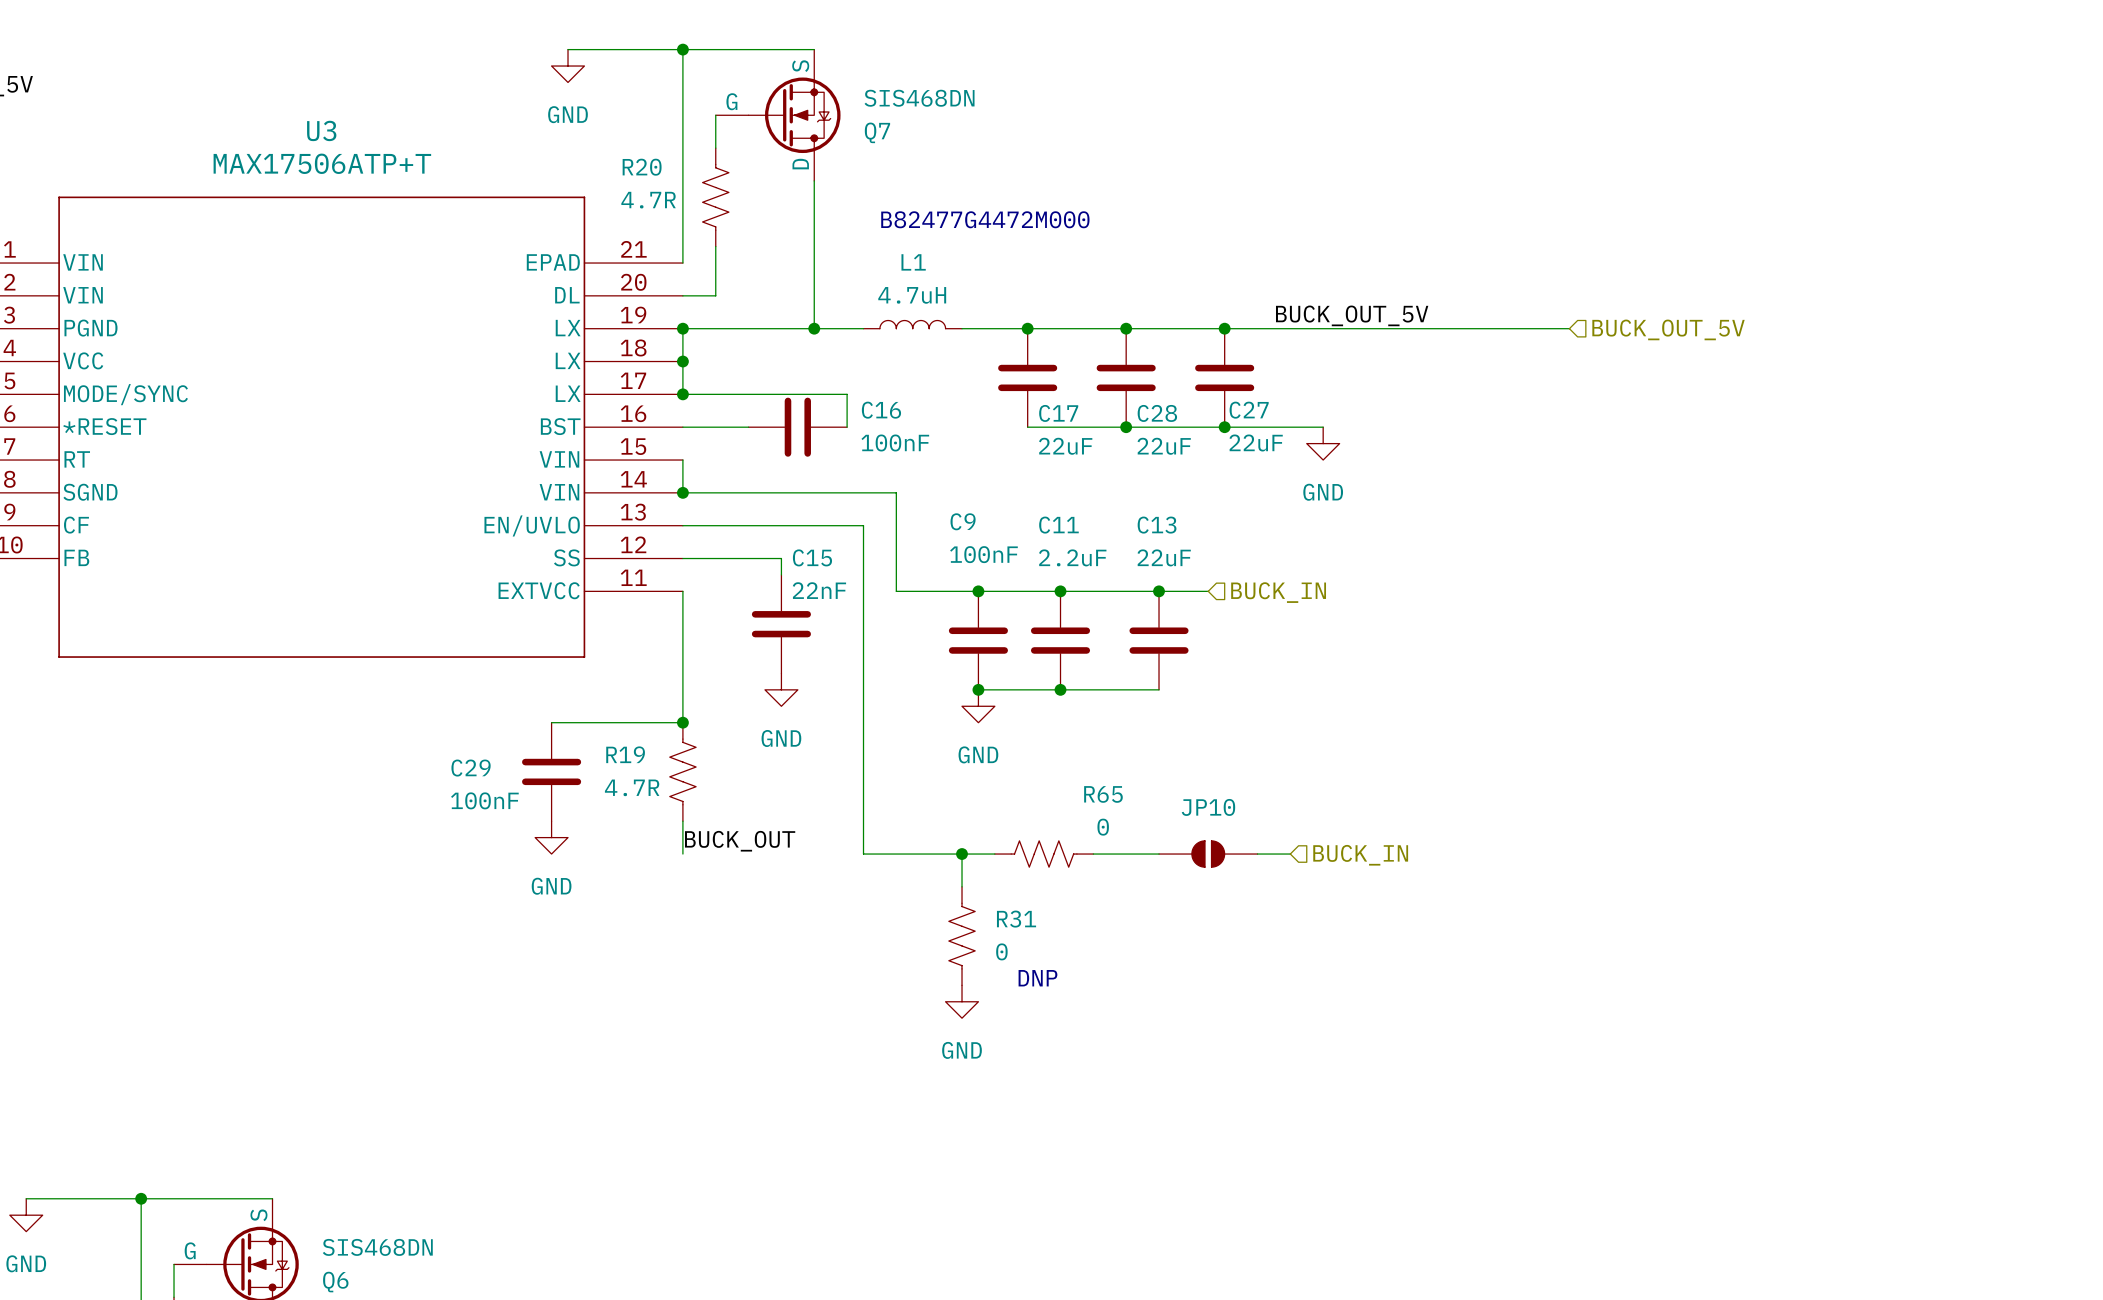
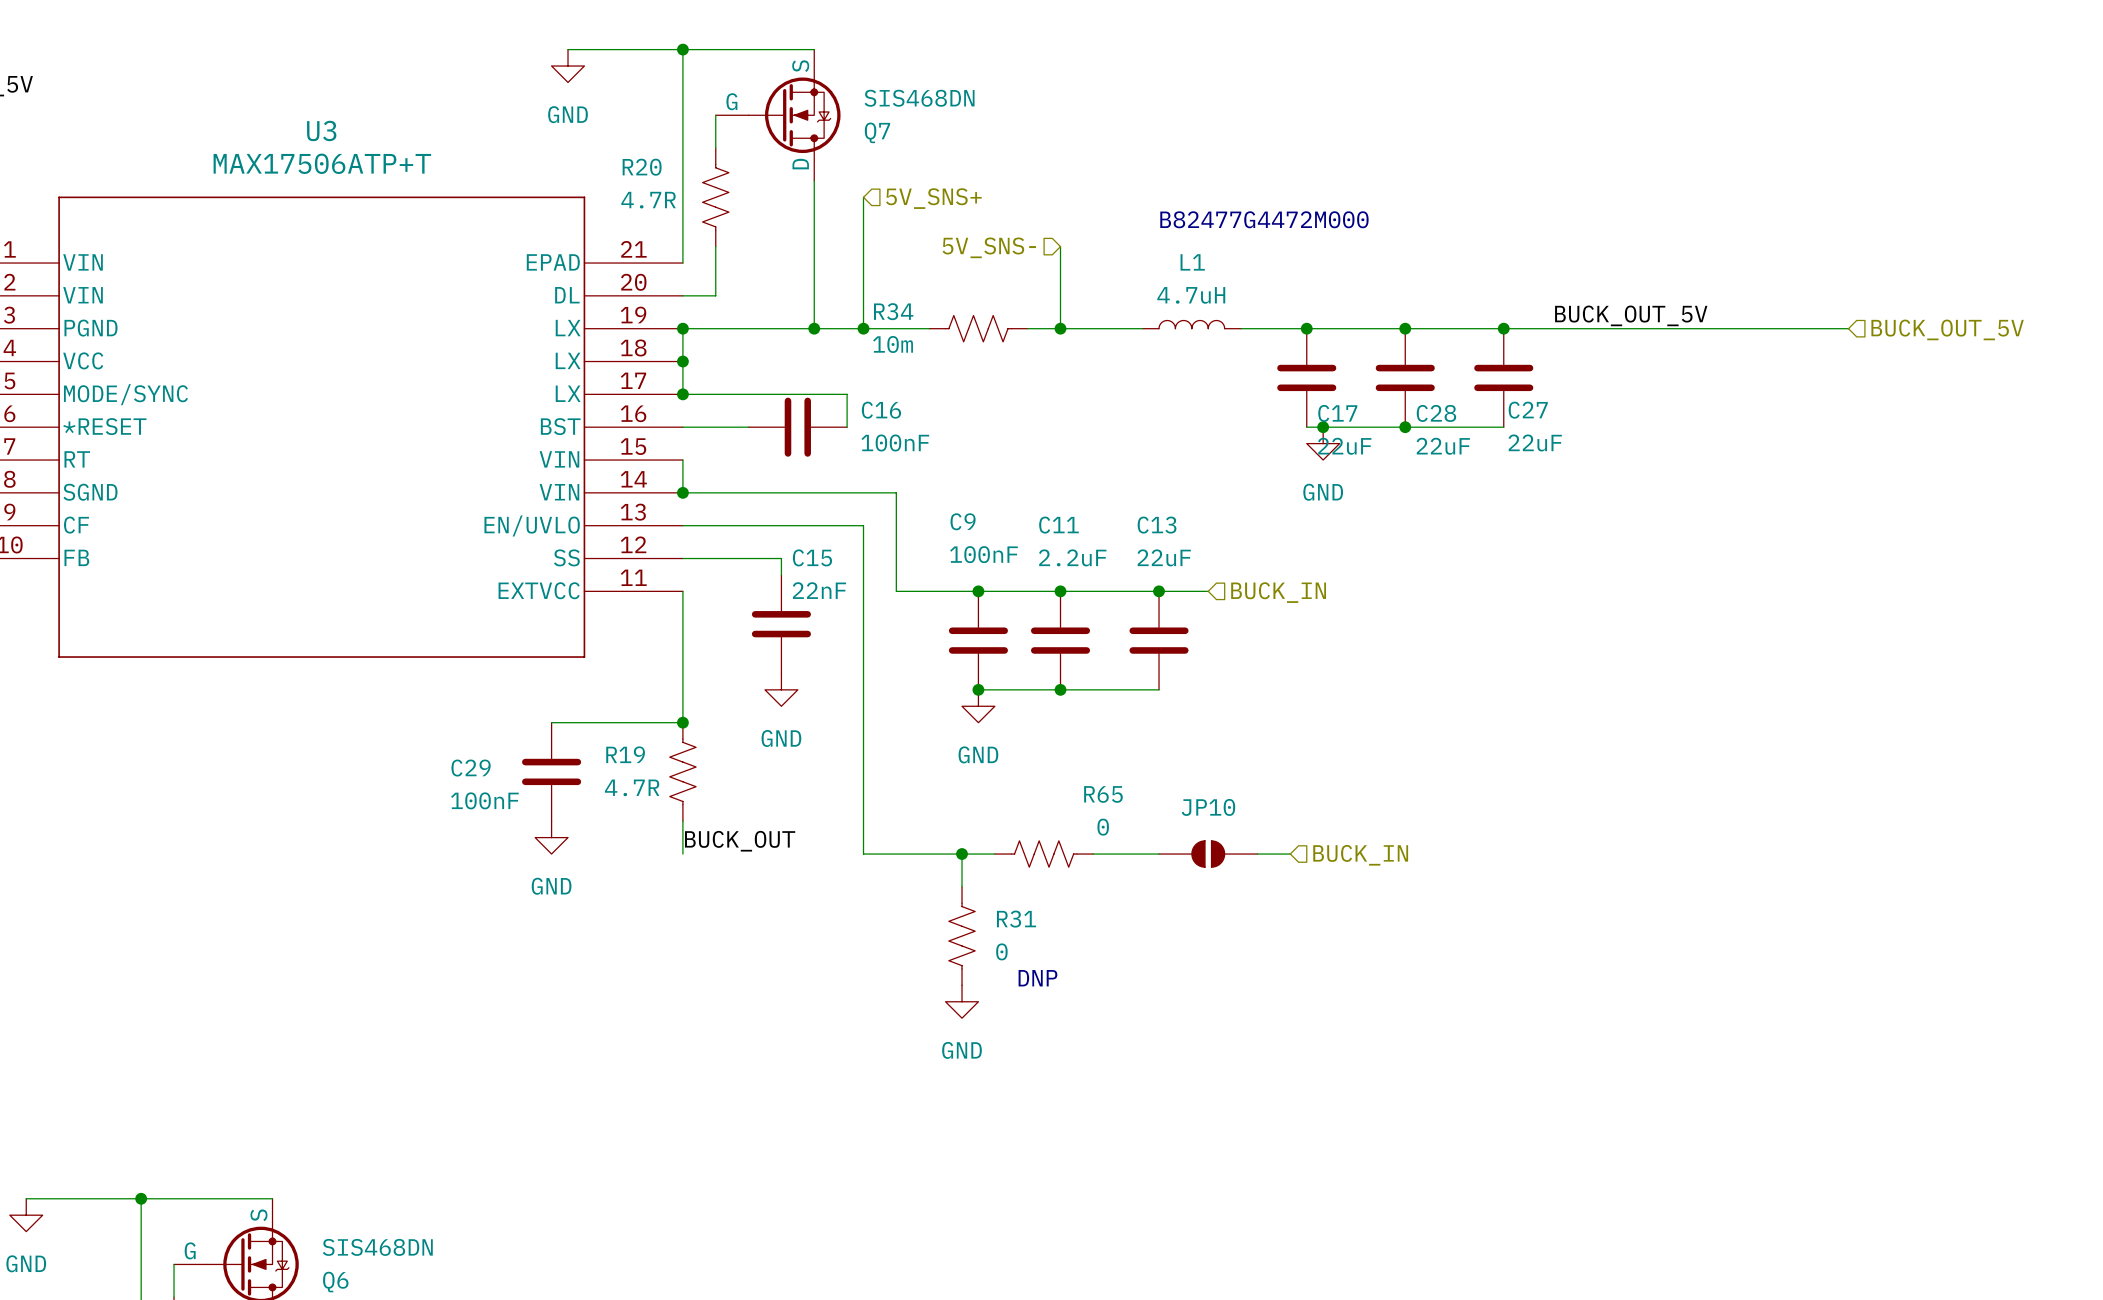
wire: none -> (863, 197) (863, 328) (929, 328)
hierarchical label: none -> 5V_SNS+ (933, 198)
text position: B82477G4472M000 (985, 219) -> B82477G4472M000 (1264, 219)
wire: none -> (1060, 246) (1060, 328)
hierarchical label: none -> 5V_SNS- (989, 247)
label position: BUCK_OUT_5V (1352, 315) -> BUCK_OUT_5V (1631, 315)
L1 position: (912, 324) -> (1191, 324)
junction: none -> (863, 328)
wire: (962, 328) (1027, 328) -> none
R34: none -> 10m (978, 328)
junction: (1027, 328) -> none
junction: none -> (1060, 328)
junction: (1126, 328) -> none
wire: (1142, 328) (1241, 328) -> none
junction: (1224, 328) -> none
junction: none -> (1306, 328)
junction: none -> (1405, 328)
junction: none -> (1503, 328)
wire: none -> (1569, 328) (1848, 328)
hierarchical label position: BUCK_OUT_5V (1668, 329) -> BUCK_OUT_5V (1947, 329)
C17 position: (1027, 377) -> (1306, 377)
C28 position: (1126, 377) -> (1405, 377)
C27 position: (1224, 377) -> (1503, 377)
wire: (1027, 427) (1306, 427) -> none
junction: (1126, 427) -> none
junction: (1224, 427) -> none
wire: none -> (1323, 427) (1503, 427)
junction: none -> (1323, 427)
junction: none -> (1405, 427)

